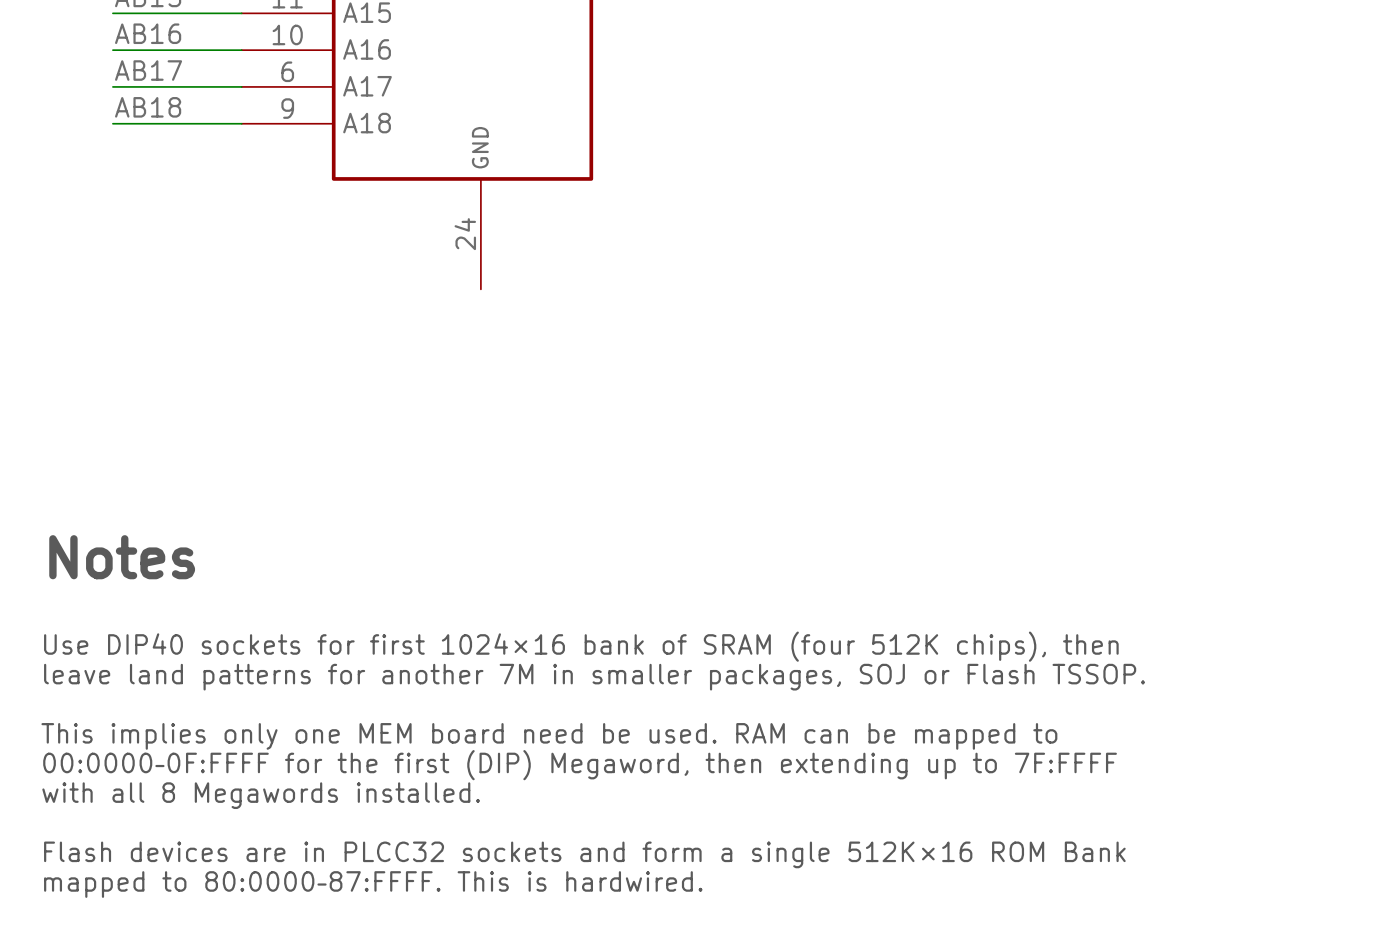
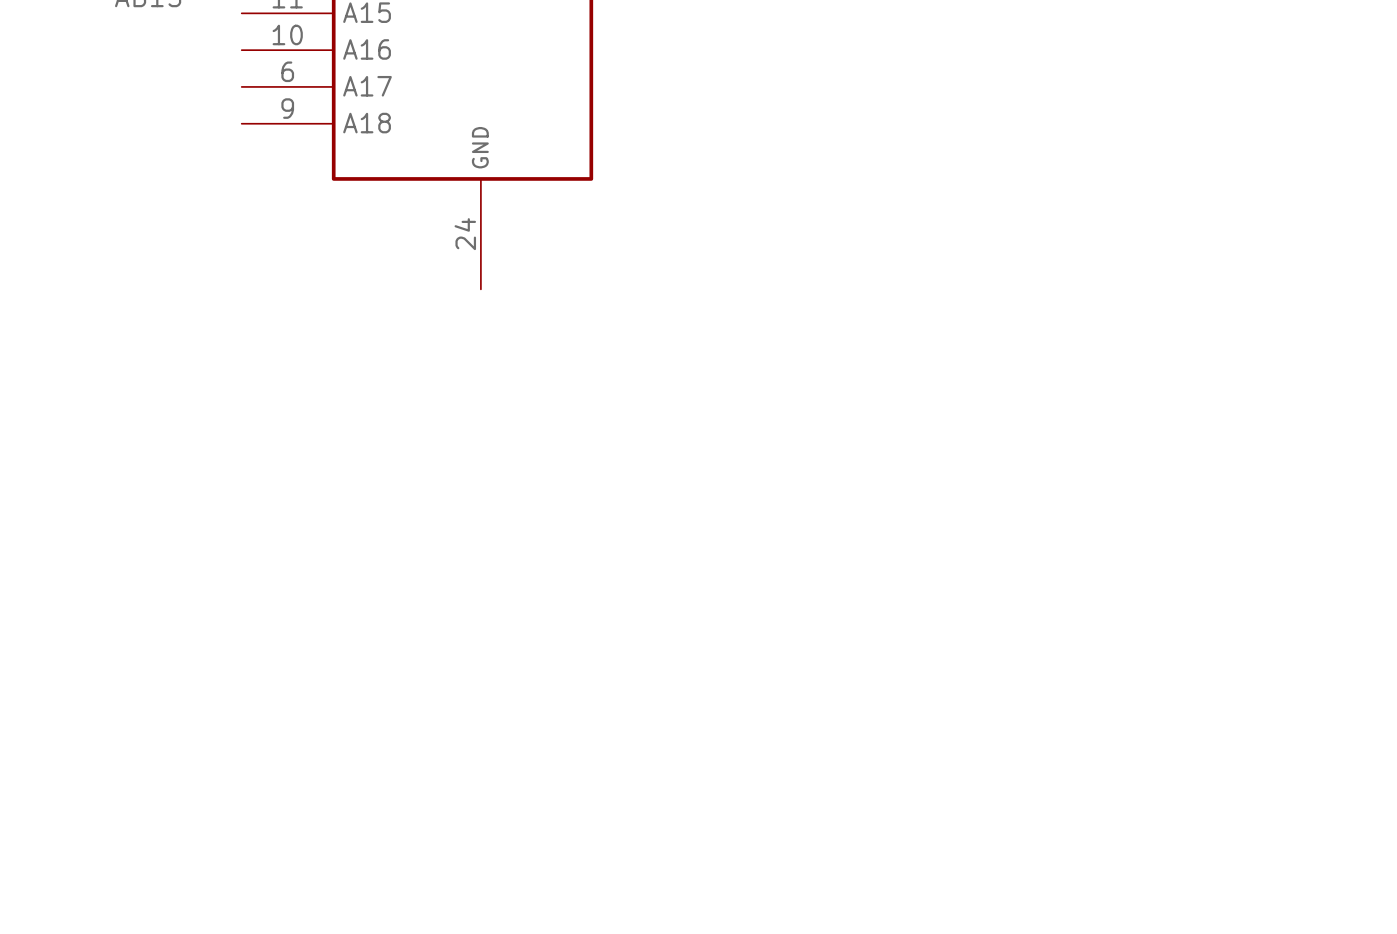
wire: (112, 13) (241, 13) -> none
label: AB16 (148, 33) -> none
wire: (112, 50) (241, 50) -> none
label: AB17 (148, 70) -> none
wire: (112, 86) (241, 86) -> none
label: AB18 (148, 107) -> none
wire: (112, 123) (241, 123) -> none
text: Notes (122, 557) -> none
text: Use DIP40 sockets for first 1024×16 bank of SRAM (four 512K chips), then (581, 646) -> none
text: leave land patterns for another 7M in smaller packages, SOJ or Flash TSSOP. (594, 677) -> none
text: This implies only one MEM board need be used. RAM can be mapped to (549, 736) -> none
text: 00:0000–0F:FFFF for the first (DIP) Megaword, then extending up to 7F:FFFF (580, 765) -> none
text: with all 8 Megawords installed. (261, 795) -> none
text: Flash devices are in PLCC32 sockets and form a single 512K×16 ROM Bank (584, 854) -> none
text: mapped to 80:0000–87:FFFF. This is hardwired. (373, 884) -> none

